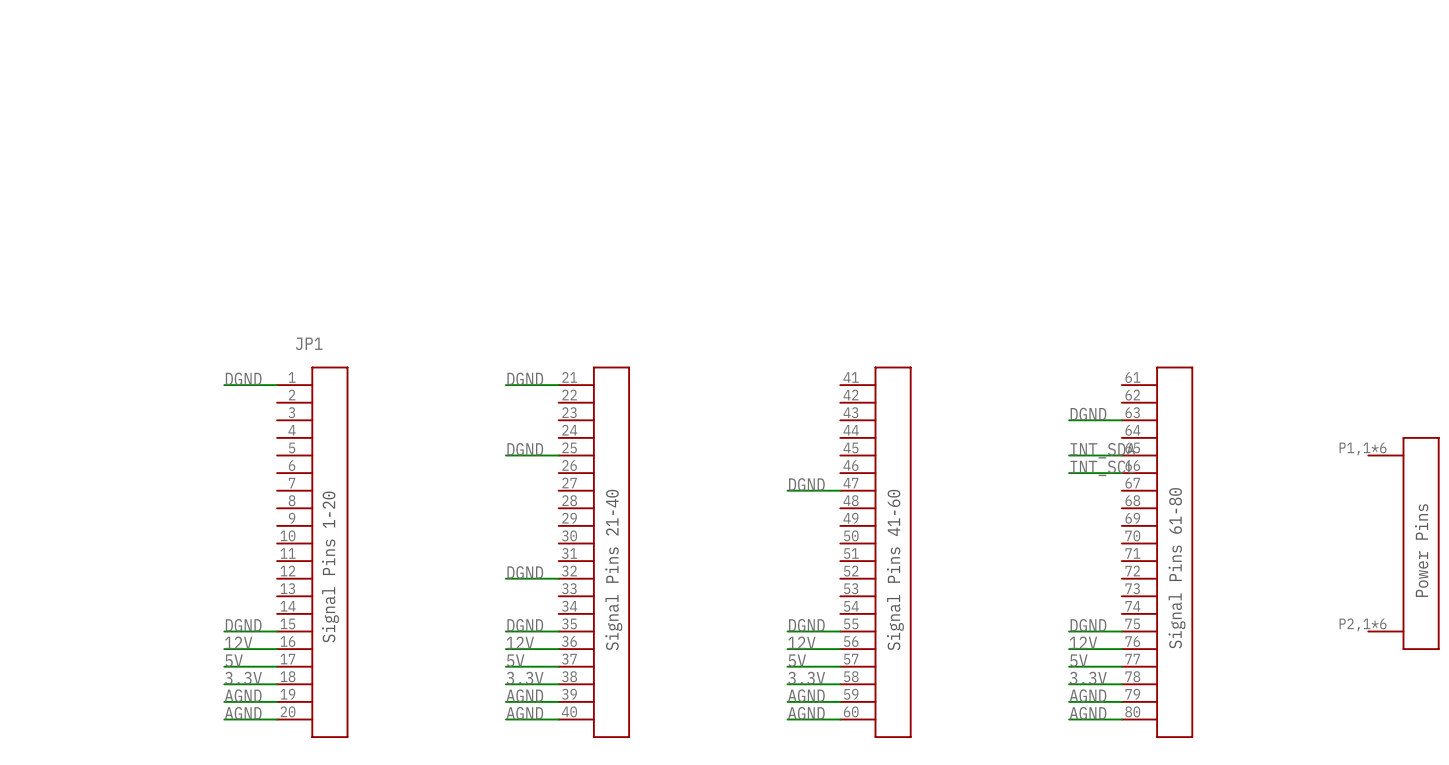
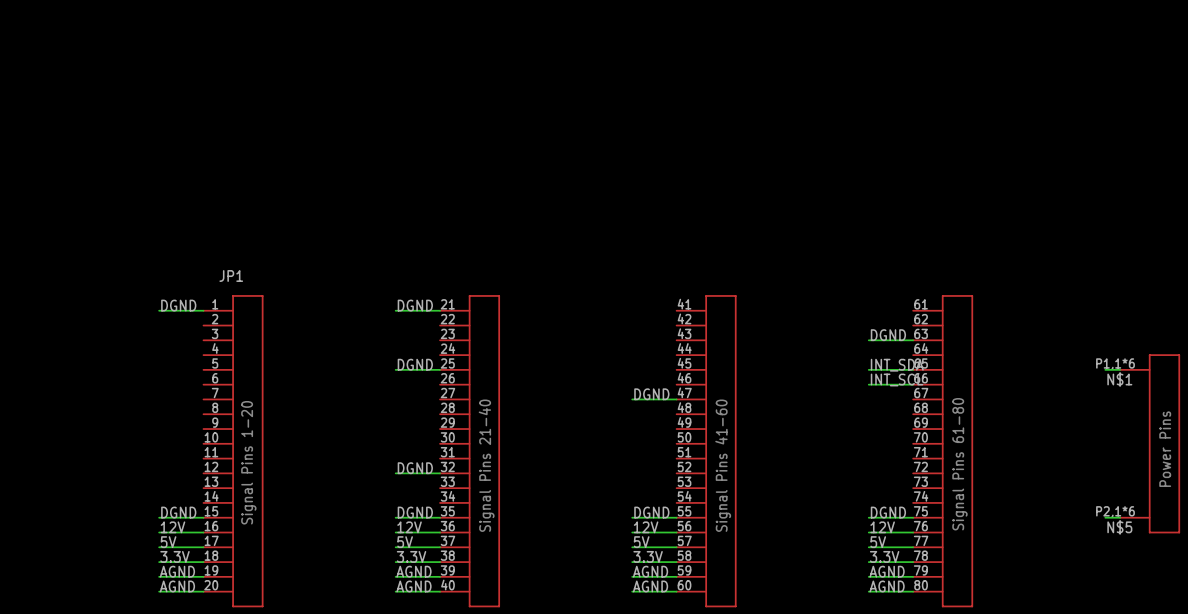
wire: none -> (1105, 369) (1120, 369)
label: none -> N$1 (1119, 379)
wire: none -> (1105, 517) (1120, 517)
label: none -> N$5 (1119, 527)

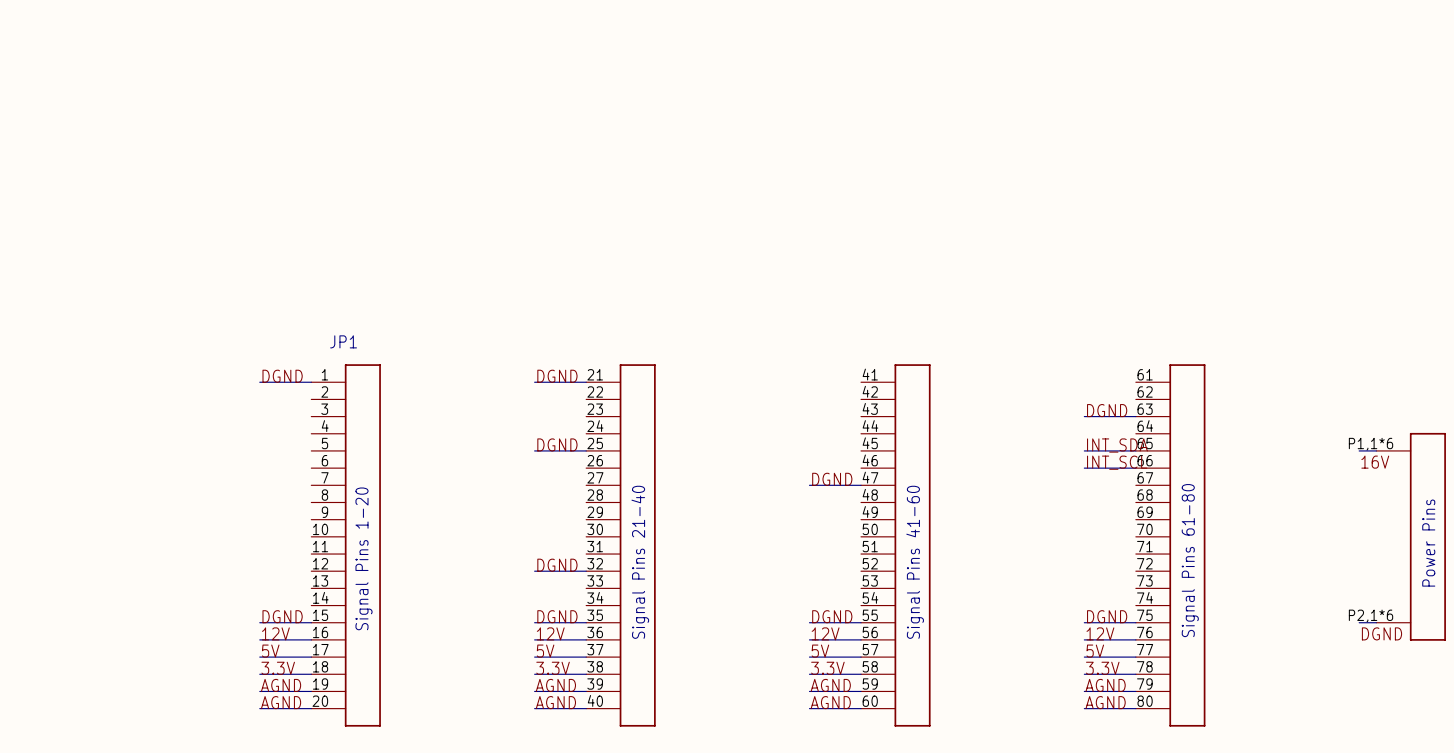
label: N$1 (1119, 379) -> 16V (1375, 462)
label: N$5 (1119, 527) -> DGND (1381, 633)

